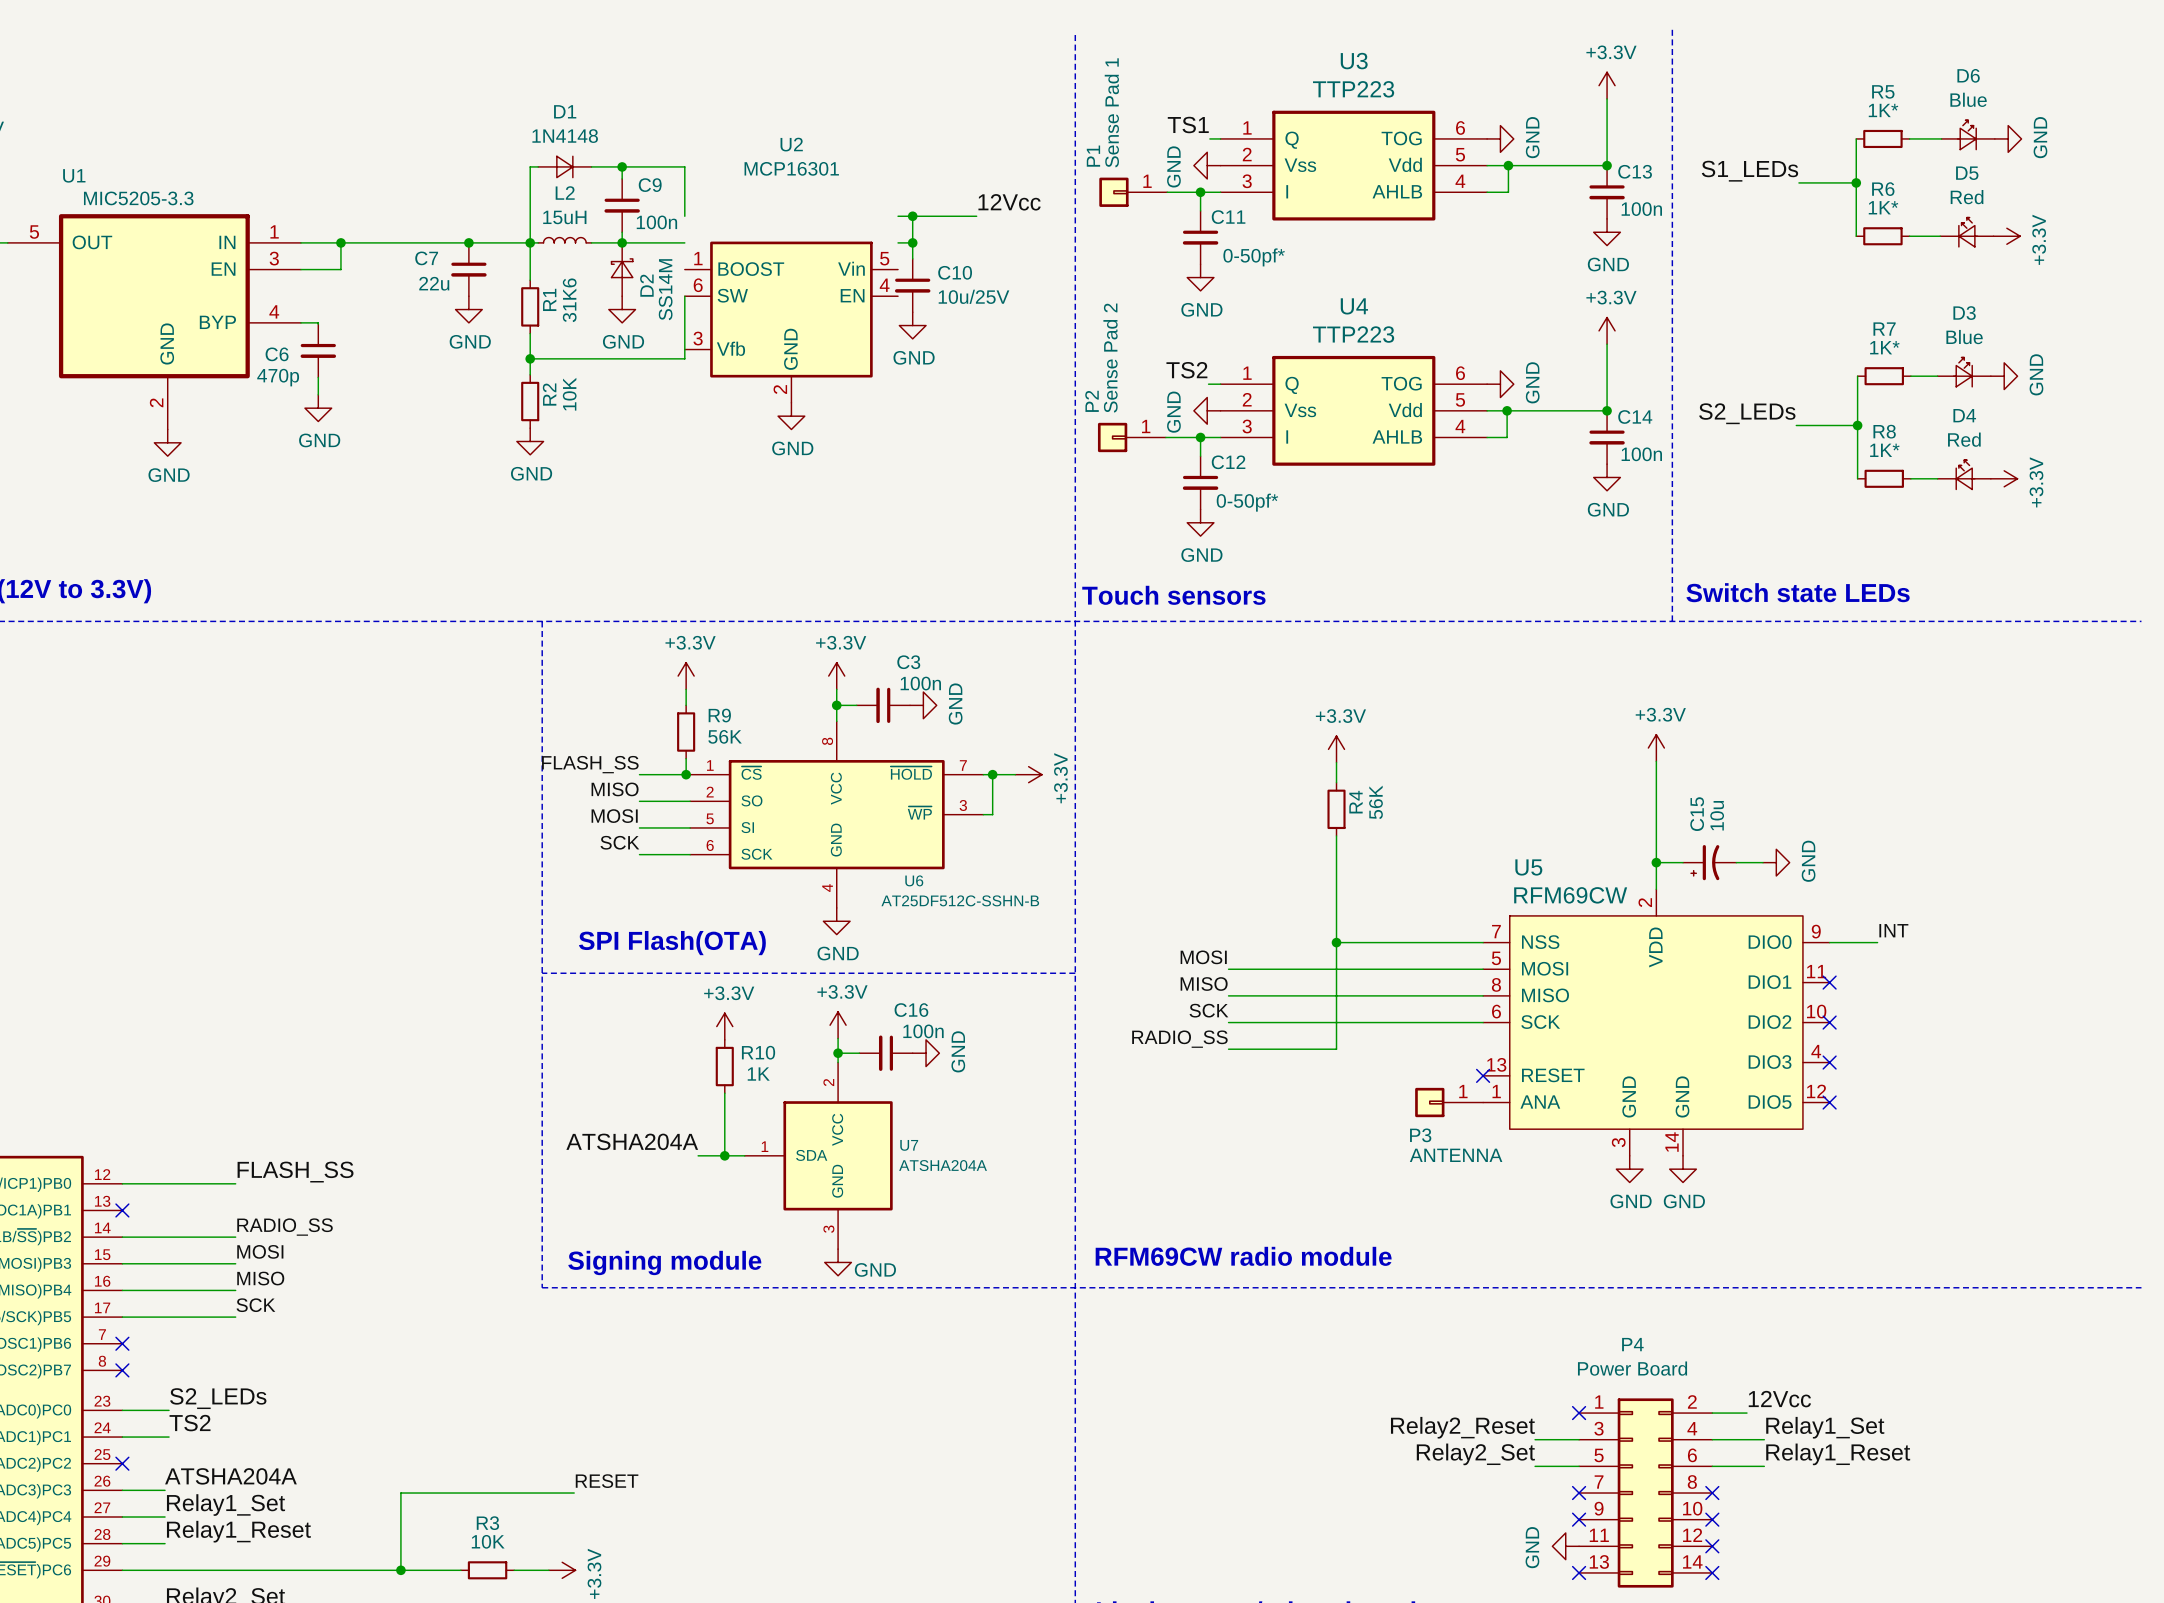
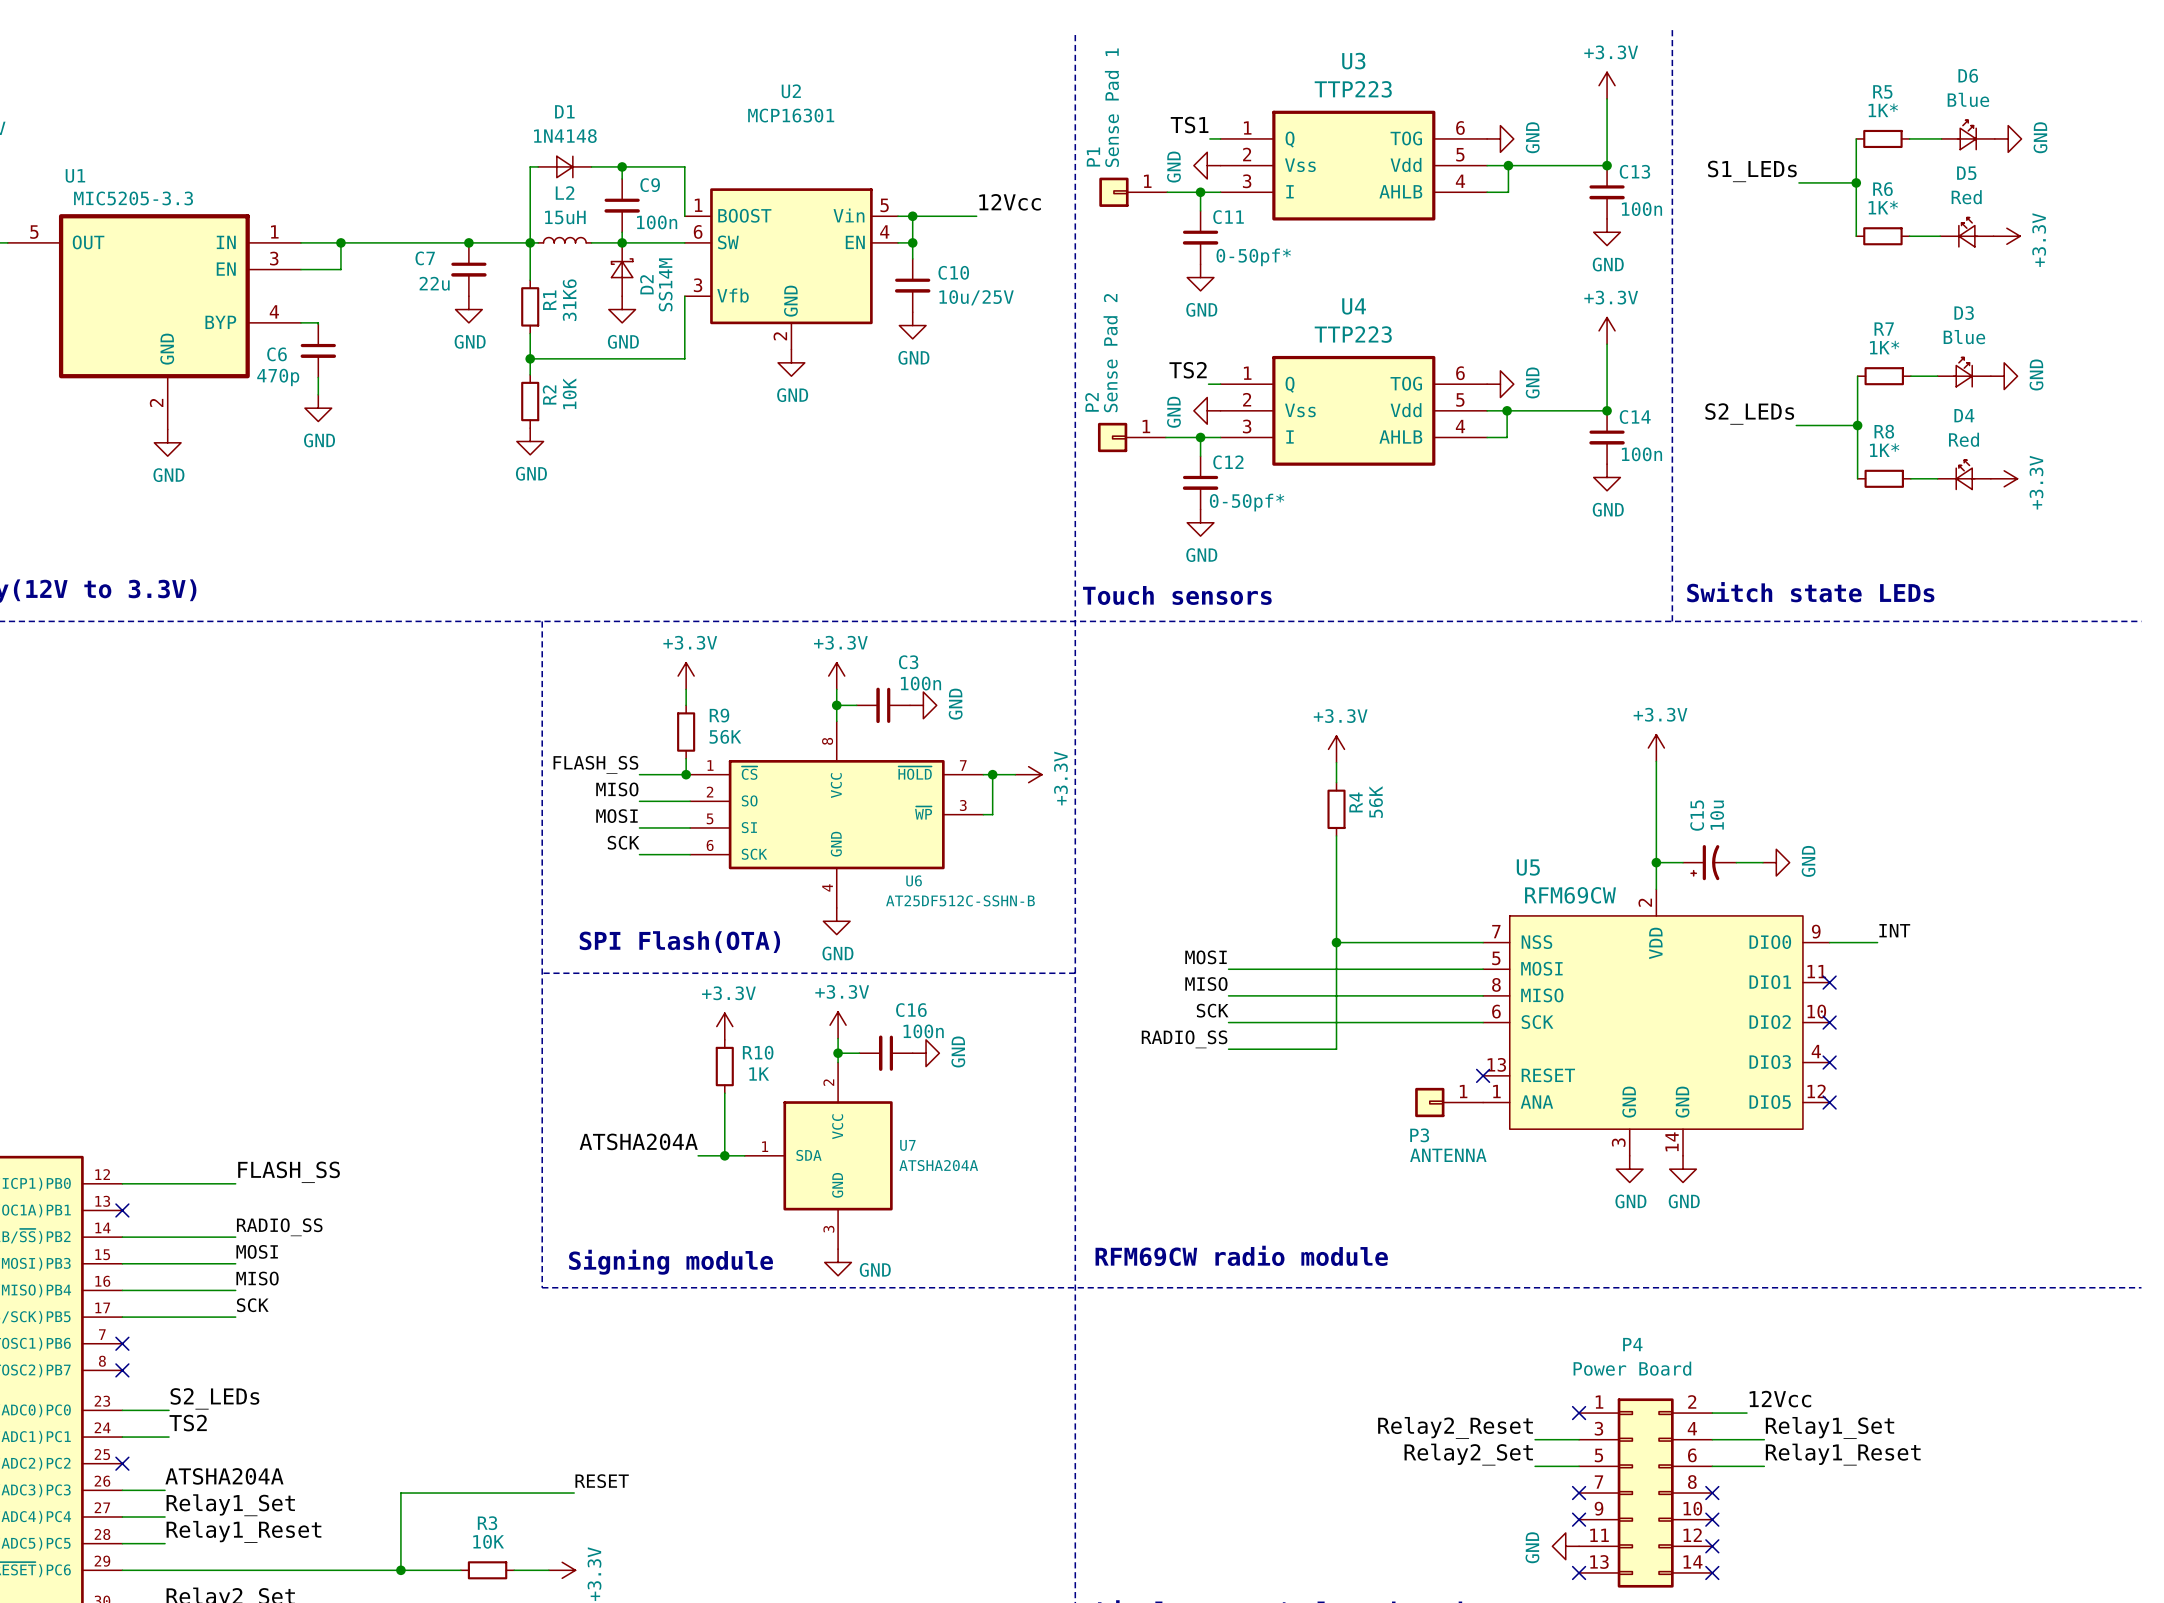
U2 position: (791, 322) -> (791, 268)
power symbol position: GND (791, 416) -> GND (791, 362)

